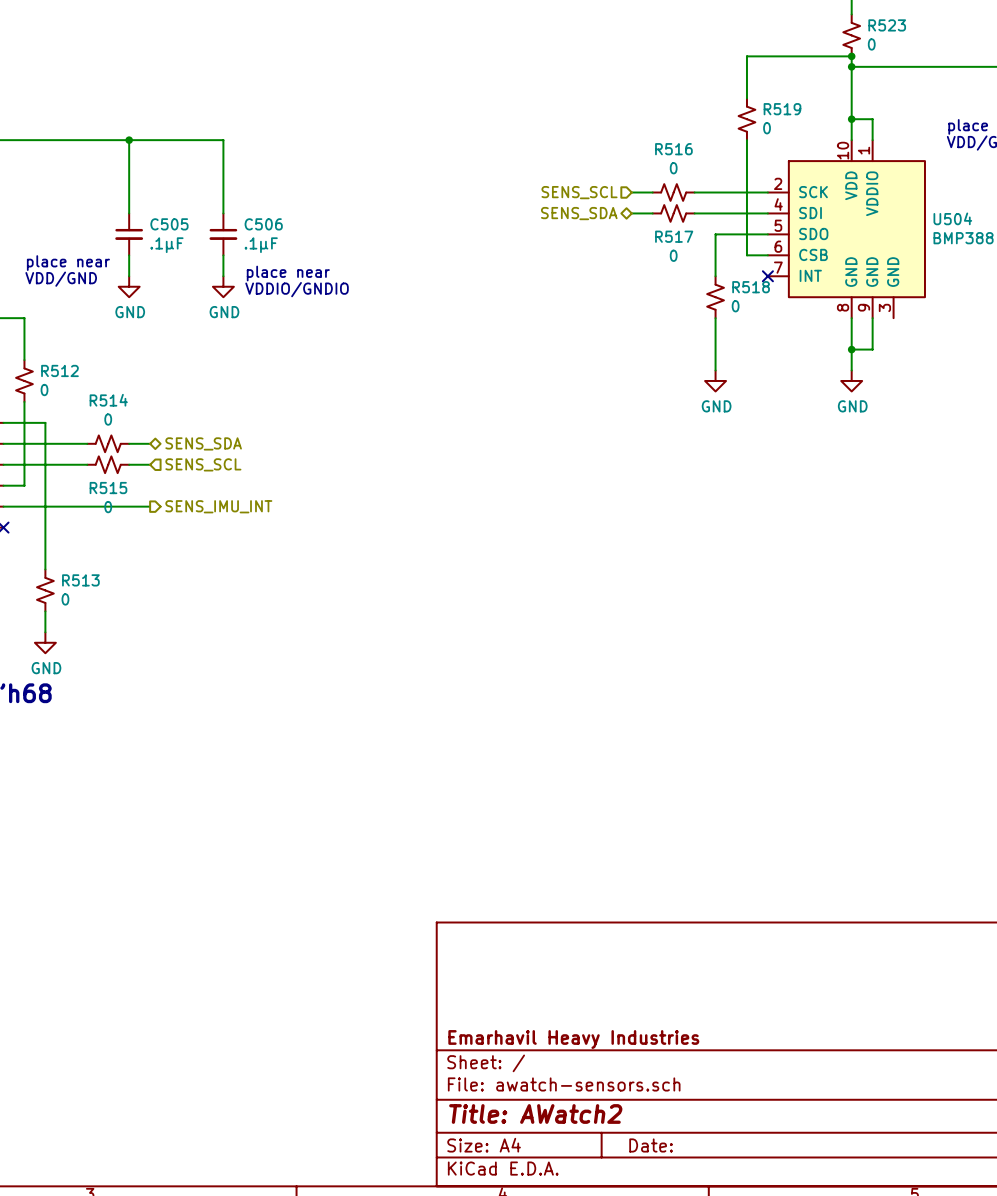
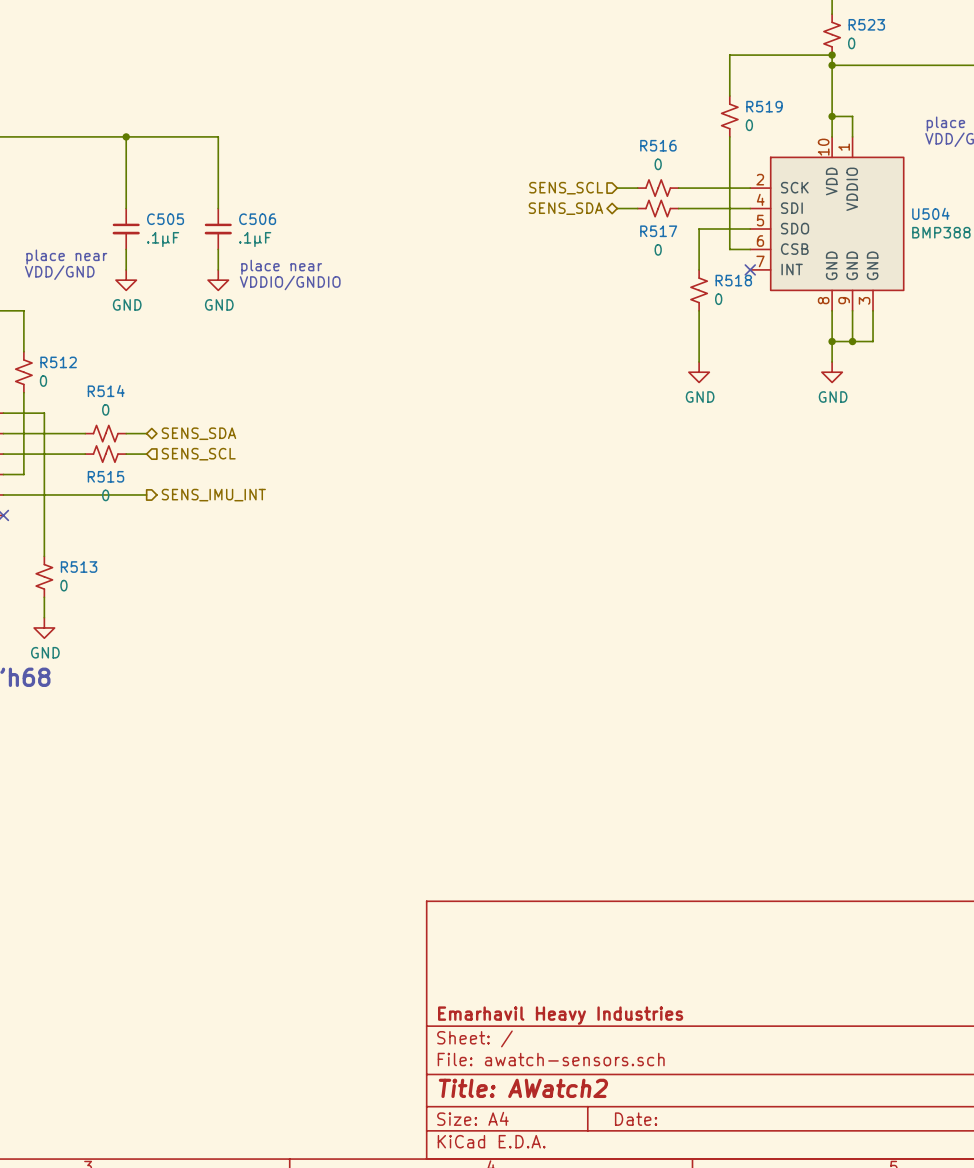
wire: none -> (873, 310) (873, 341) (852, 341)
junction: none -> (852, 341)

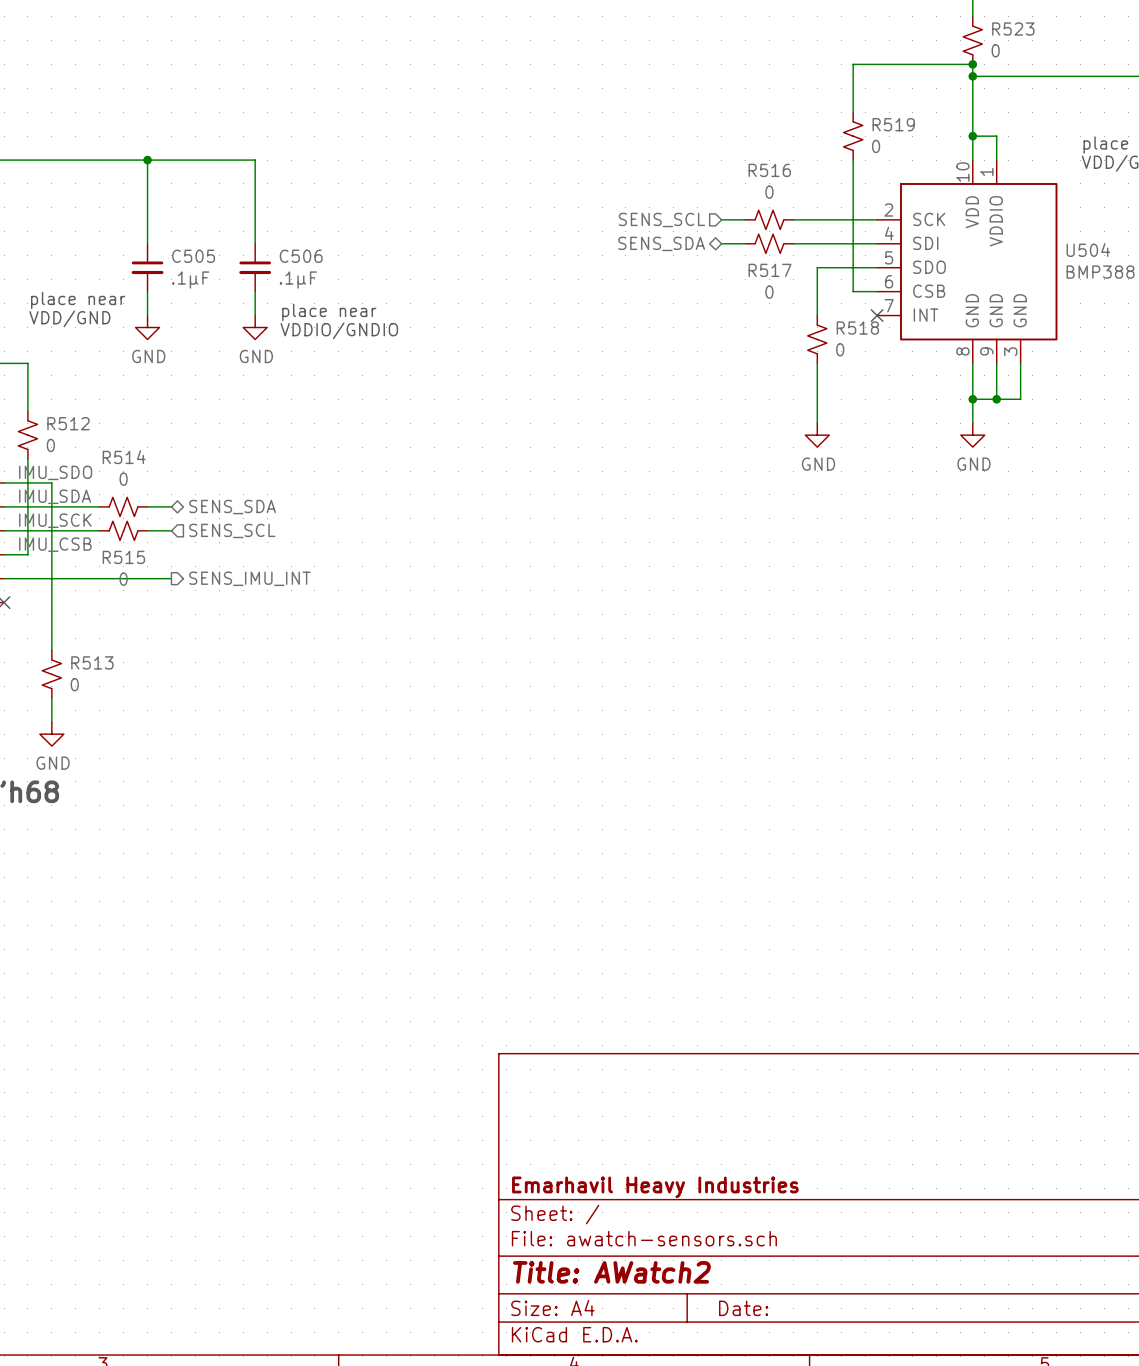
label: none -> IMU_SDO (55, 472)
label: none -> IMU_SDA (55, 496)
label: none -> IMU_SCK (55, 520)
label: none -> IMU_CSB (55, 544)

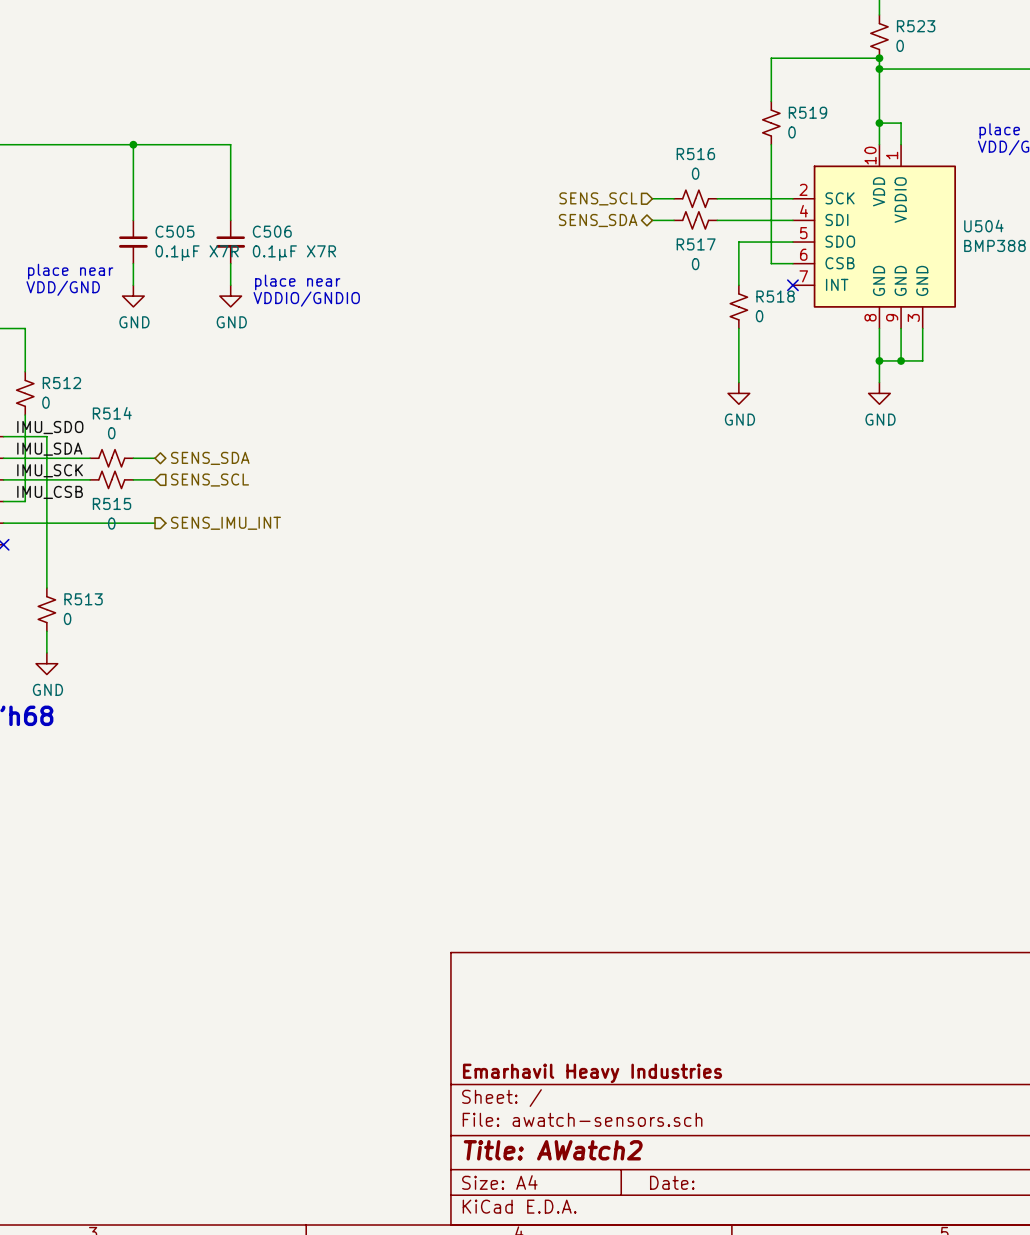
C505 value: .1µF (190, 280) -> 0.1µF X7R (197, 253)
C506 value: .1µF (298, 280) -> 0.1µF X7R (294, 253)

